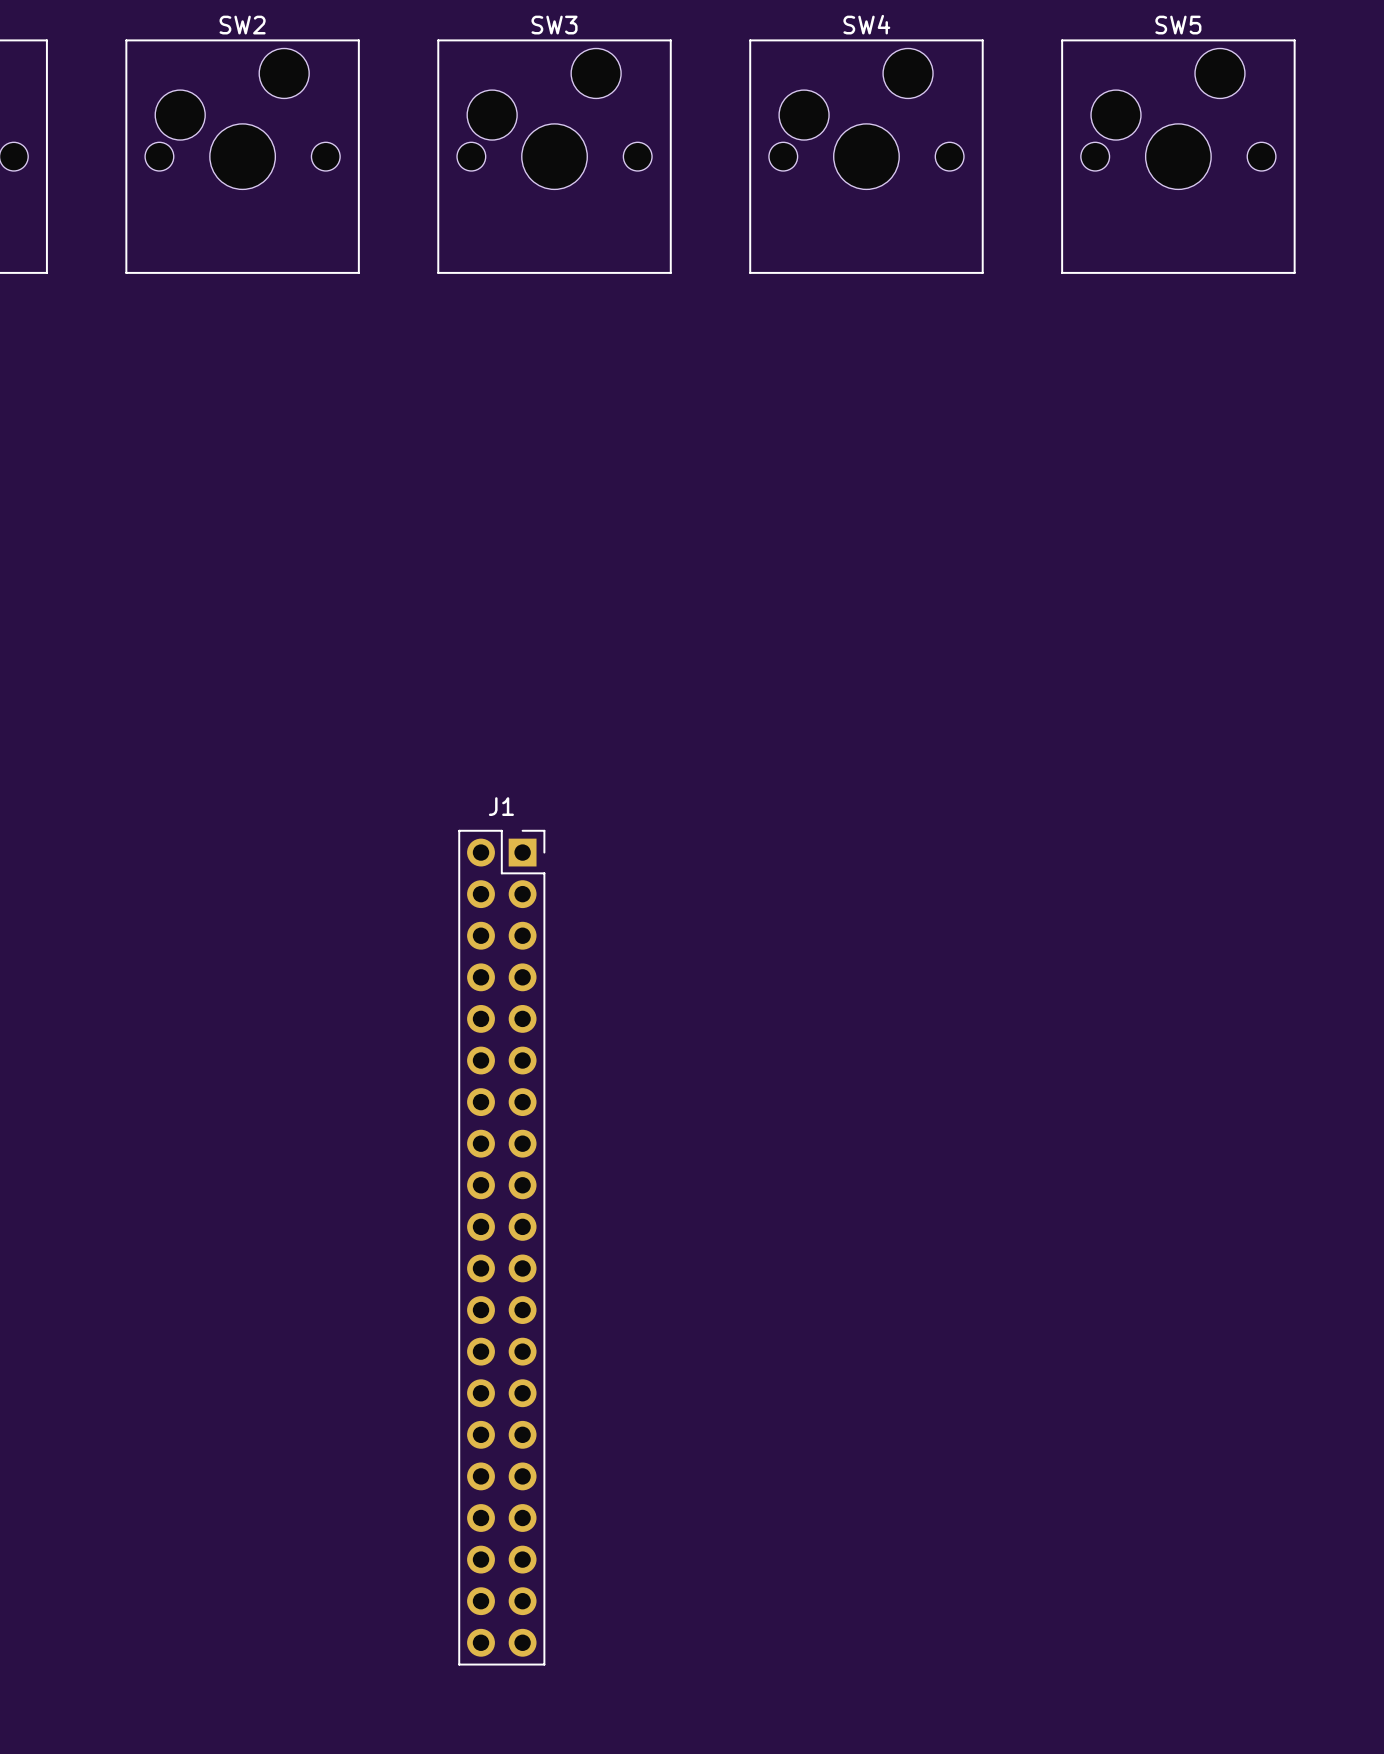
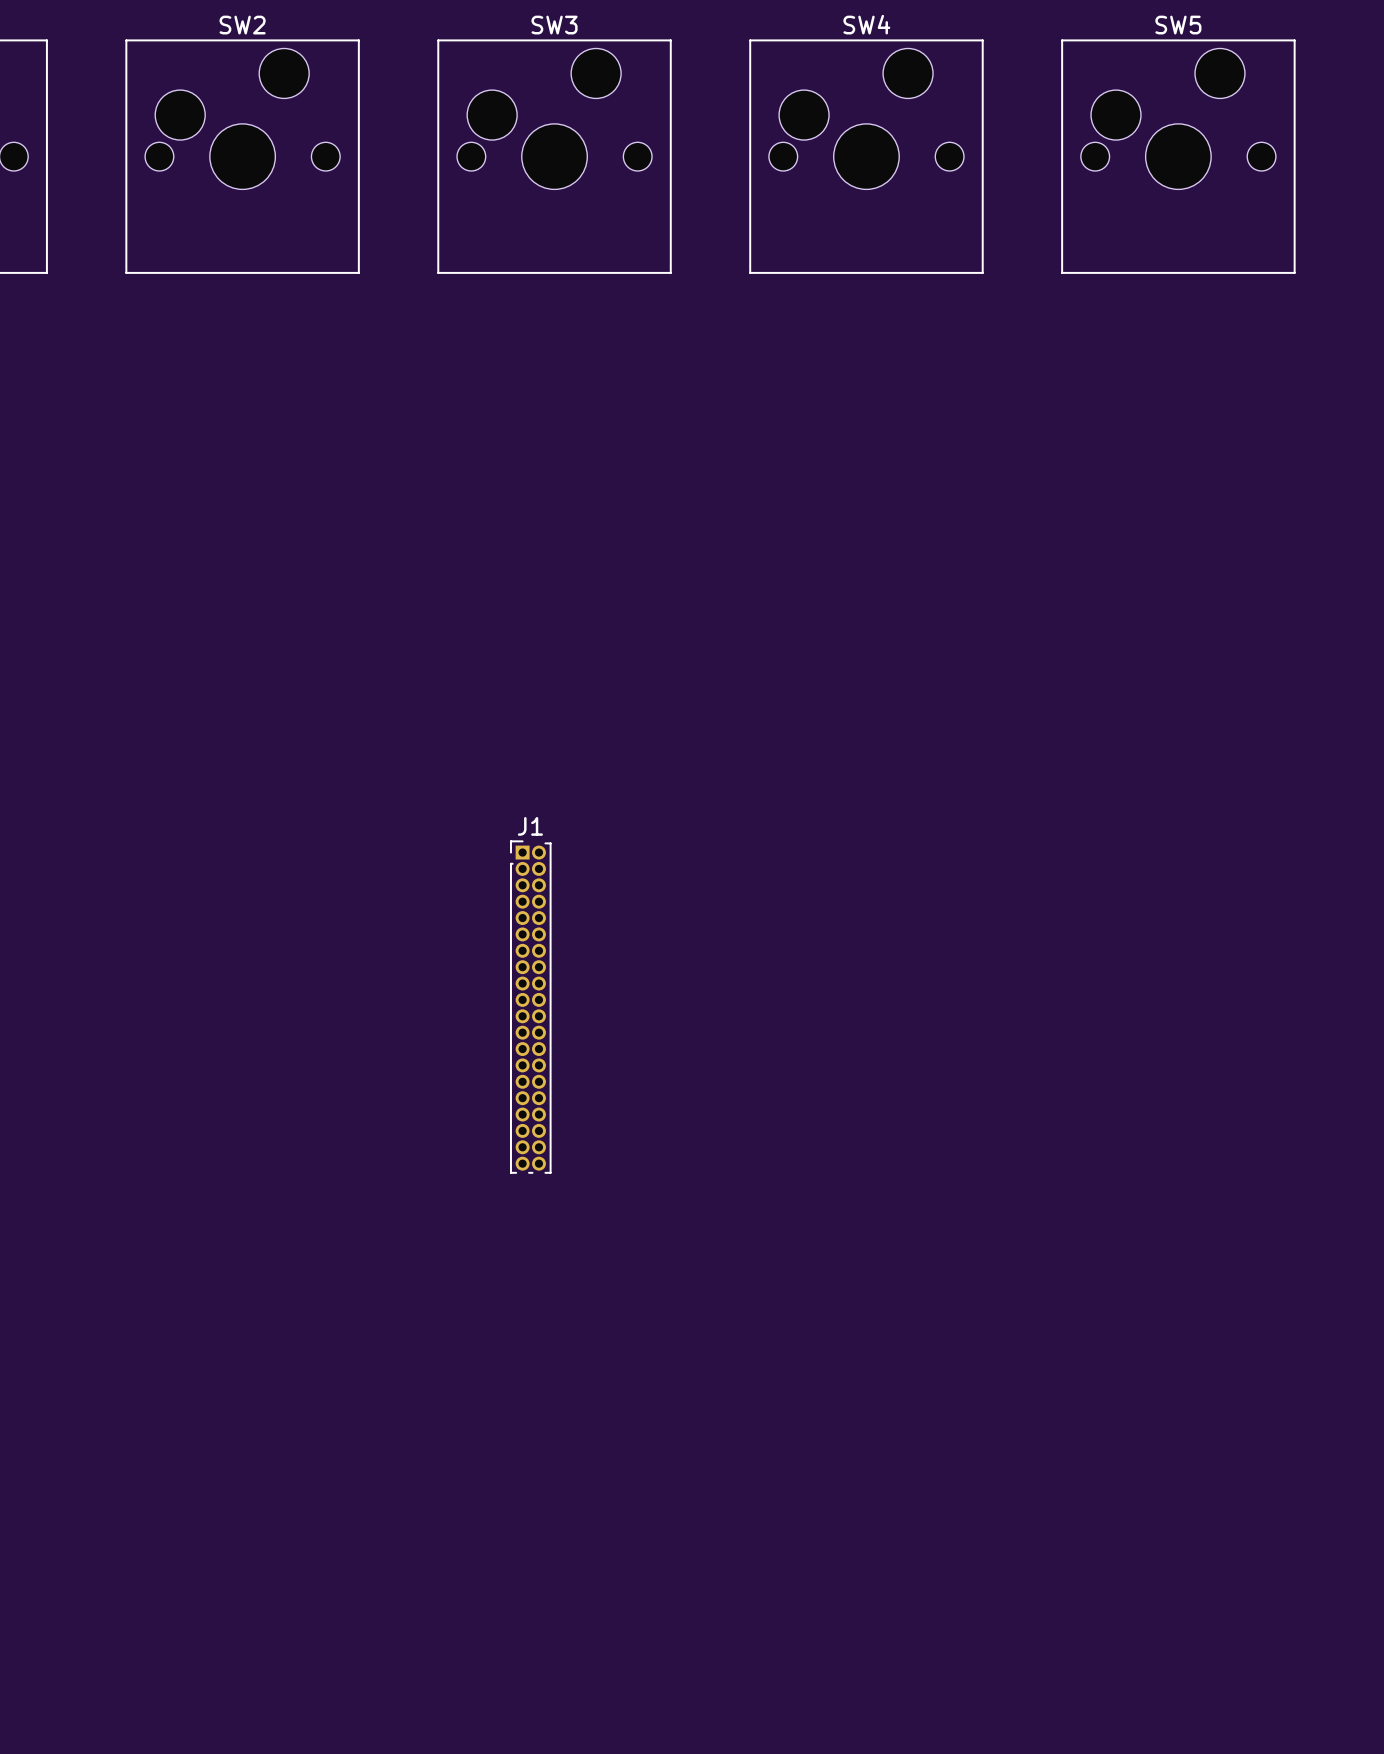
J1 name position: J1 (501, 806) -> J1 (530, 826)
J1 footprint: [458, 829, 546, 1666] -> [509, 840, 552, 1174]

